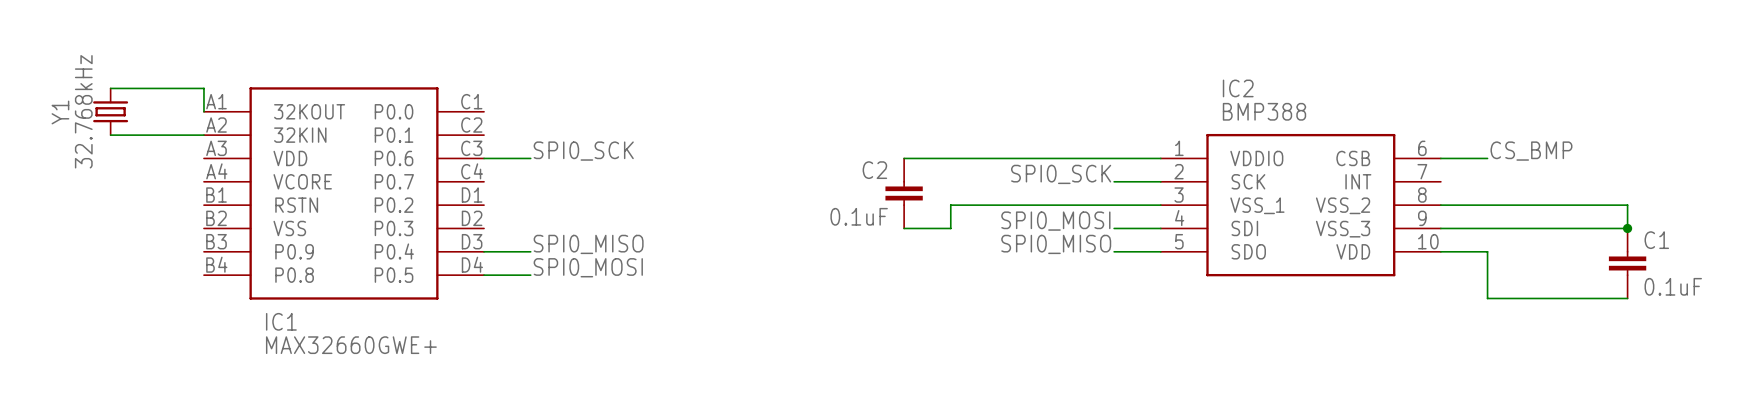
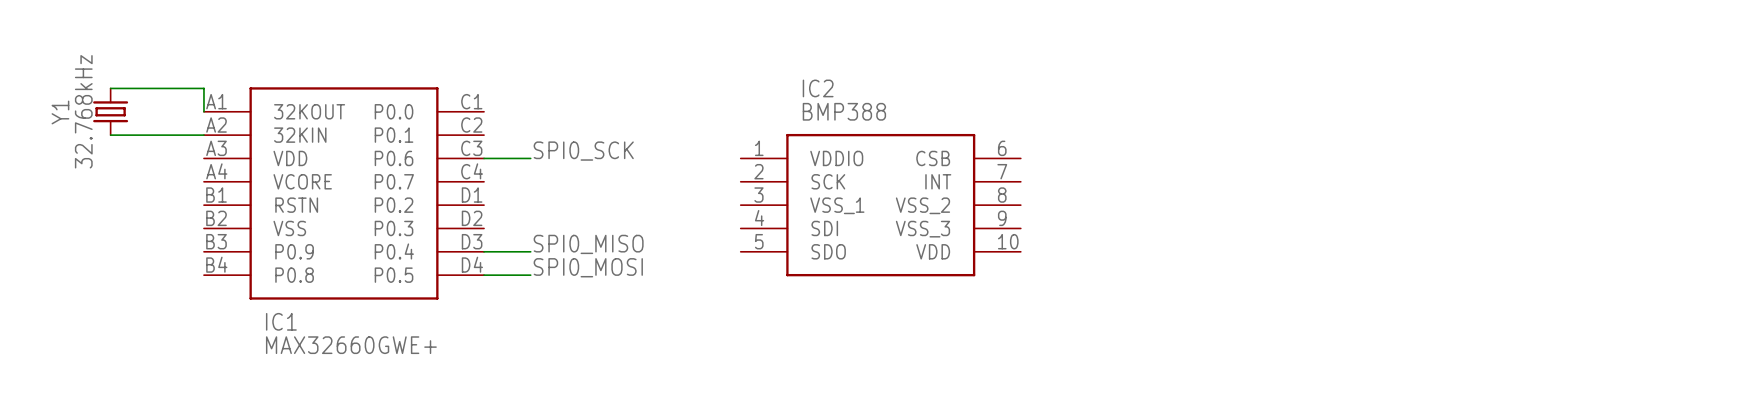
label: CS_BMP (1531, 151) -> none
wire: (904, 158) (1160, 158) -> none
wire: (1440, 158) (1487, 158) -> none
label: SPI0_SCK (1061, 174) -> none
wire: (1114, 181) (1160, 181) -> none
C2: 0.1uF (904, 193) -> none
wire: (1160, 205) (950, 205) (950, 228) (904, 228) -> none
IC2 position: (1300, 205) -> (880, 205)
wire: (1440, 205) (1627, 205) (1627, 228) (1440, 228) -> none
label: SPI0_MOSI (1055, 221) -> none
wire: (1114, 228) (1160, 228) -> none
junction: (1627, 228) -> none
label: SPI0_MISO (1056, 244) -> none
wire: (1114, 251) (1160, 251) -> none
wire: (1440, 251) (1487, 251) (1487, 298) (1627, 298) -> none
C1: 0.1uF (1627, 263) -> none

